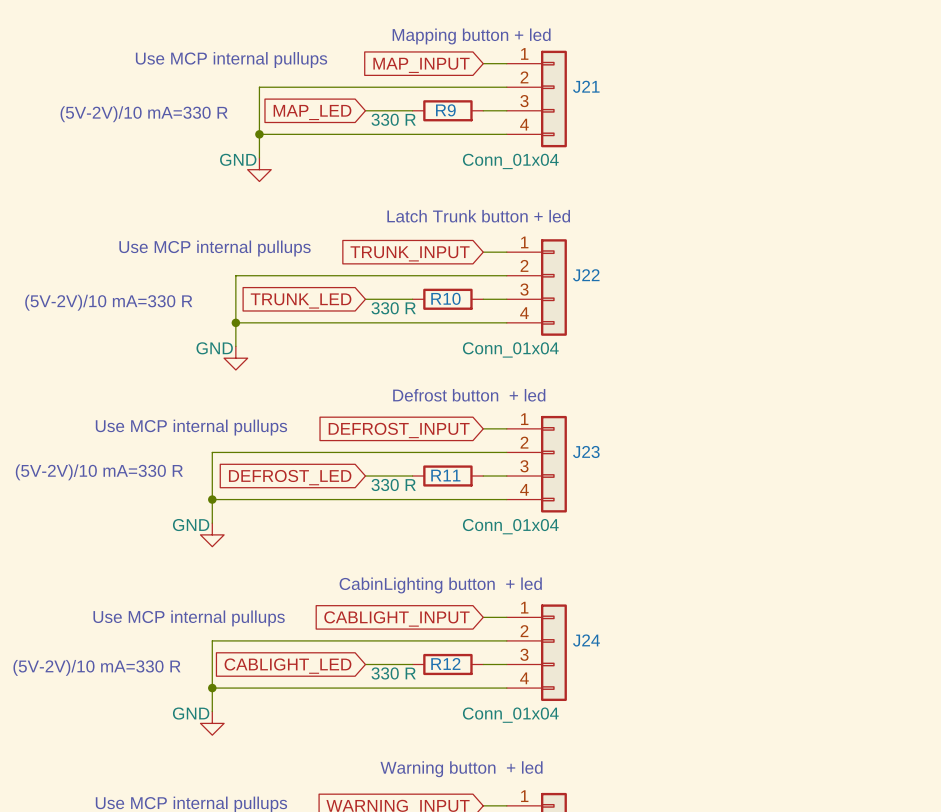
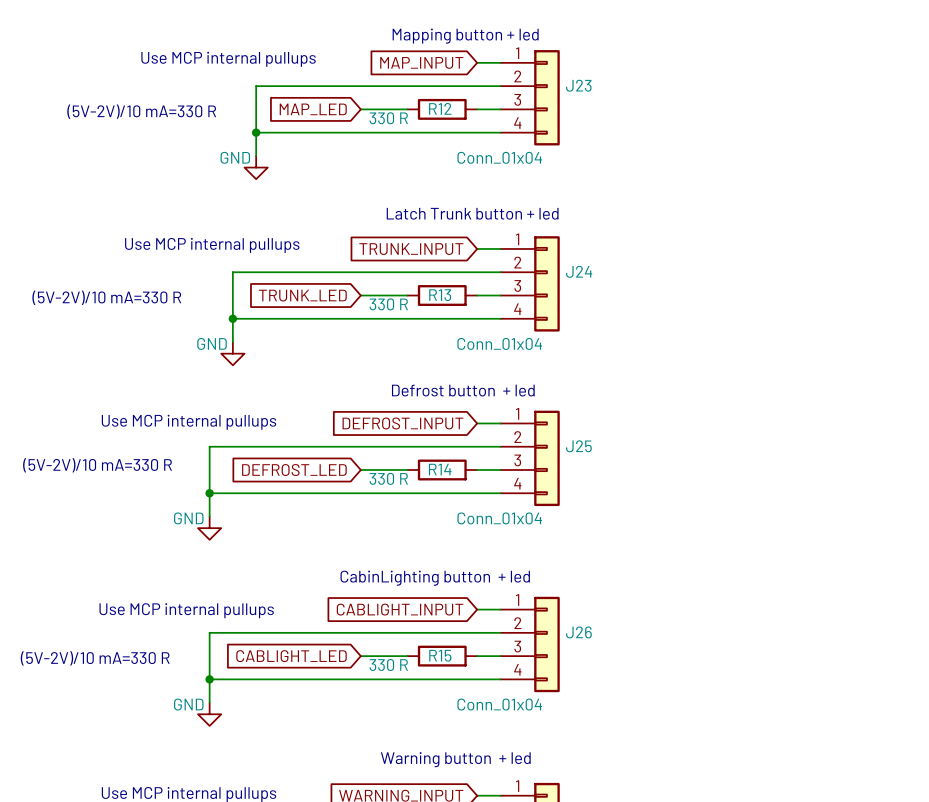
J21 name: J21 (586, 86) -> J23 (578, 85)
R9 name: R9 (445, 110) -> R12 (440, 108)
J22 name: J22 (586, 275) -> J24 (579, 271)
R10 name: R10 (445, 298) -> R13 (440, 295)
J23 name: J23 (586, 451) -> J25 (578, 446)
R11 name: R11 (445, 475) -> R14 (440, 469)
J24 name: J24 (586, 640) -> J26 (578, 632)
R12 name: R12 (445, 663) -> R15 (440, 655)

